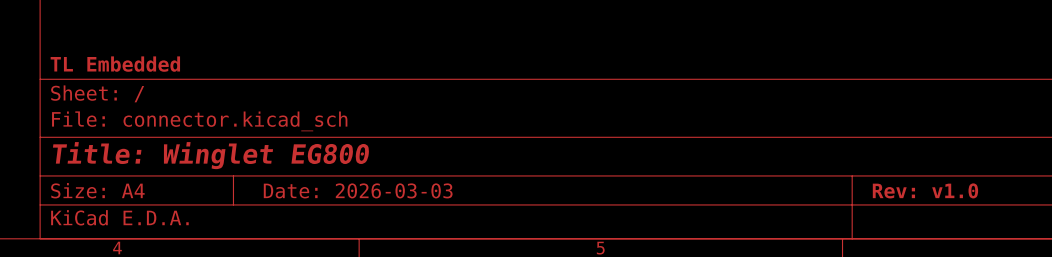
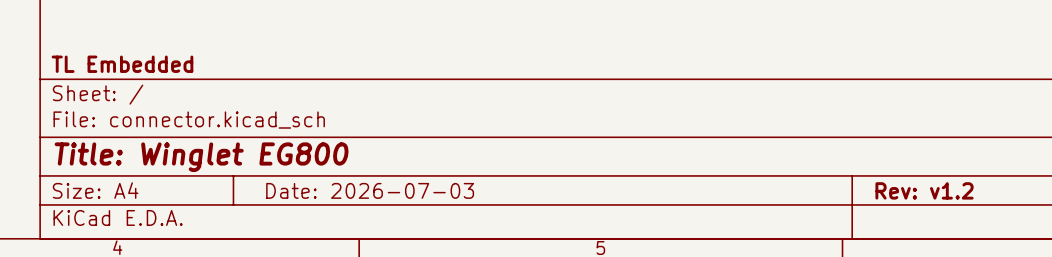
title block: Date: 2026-03-03 (358, 190) -> Date: 2026-07-03 (370, 190)
title block: Rev: v1.0 (925, 190) -> Rev: v1.2 (924, 190)

